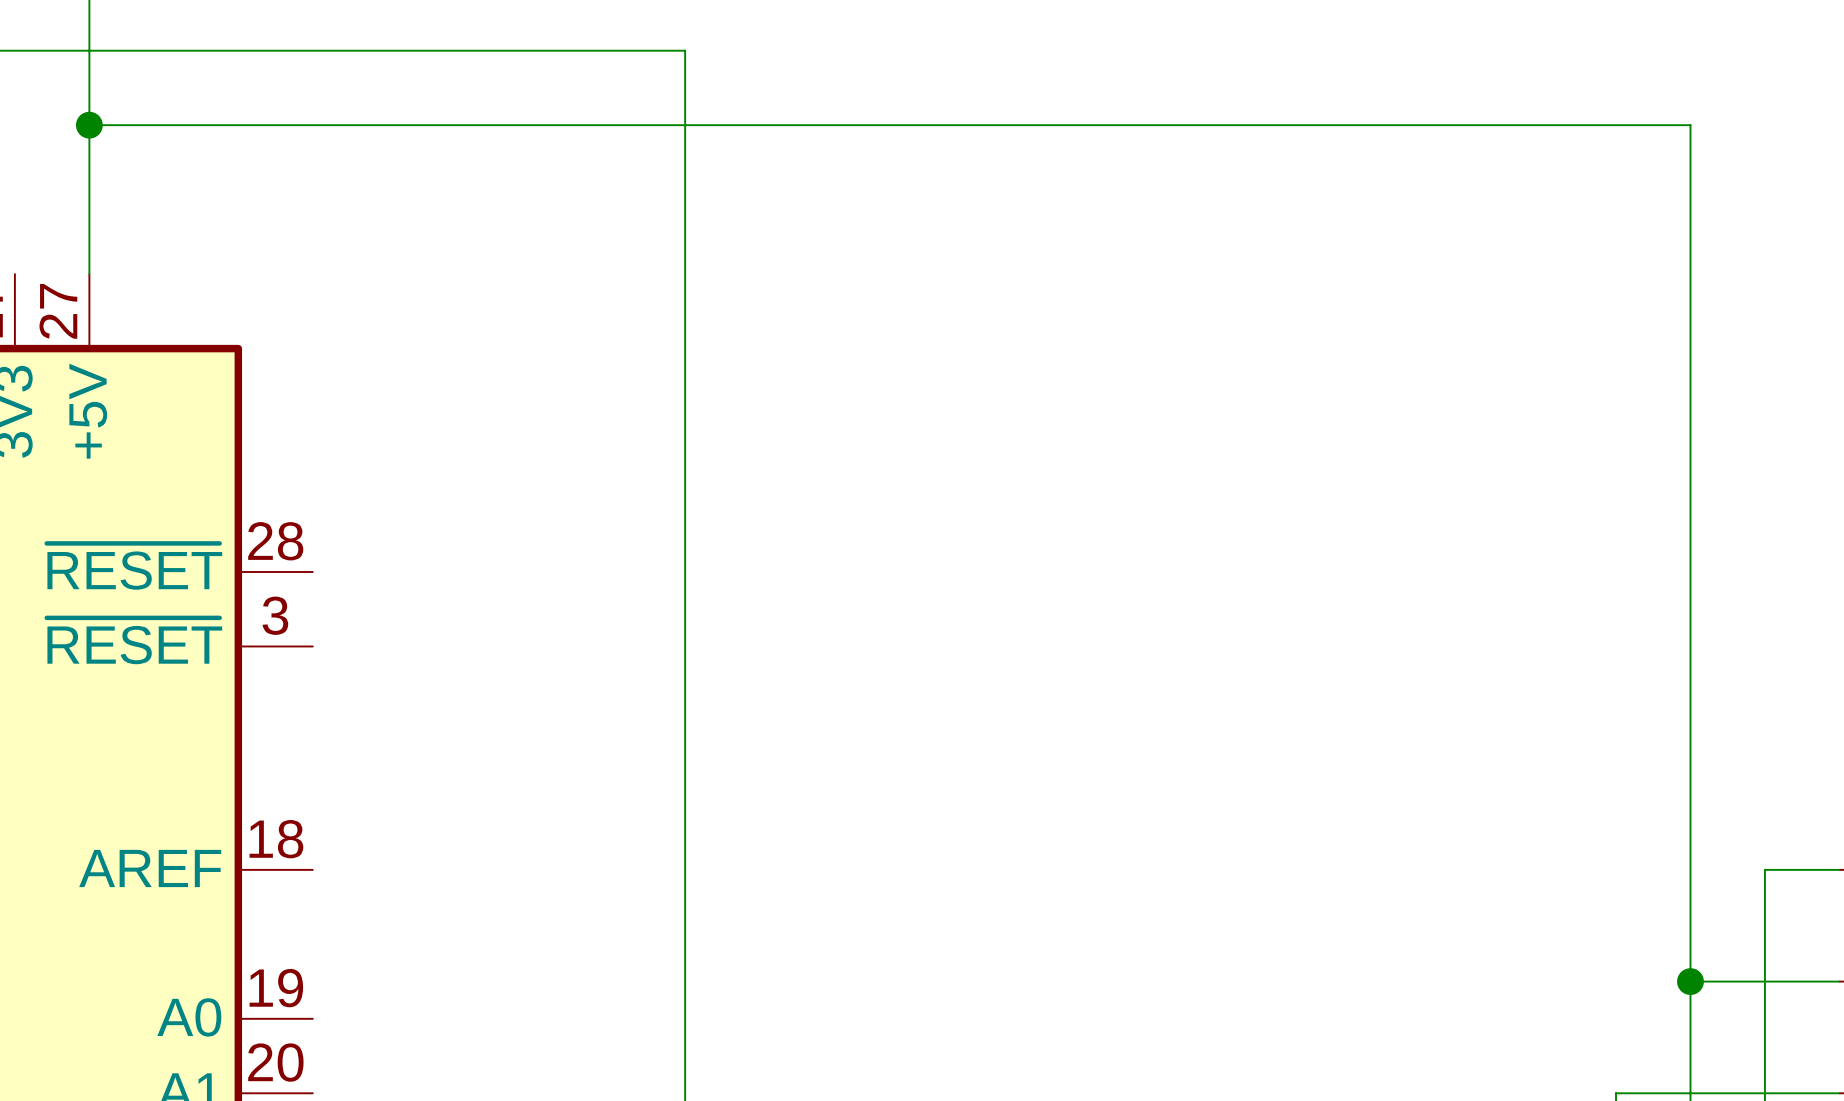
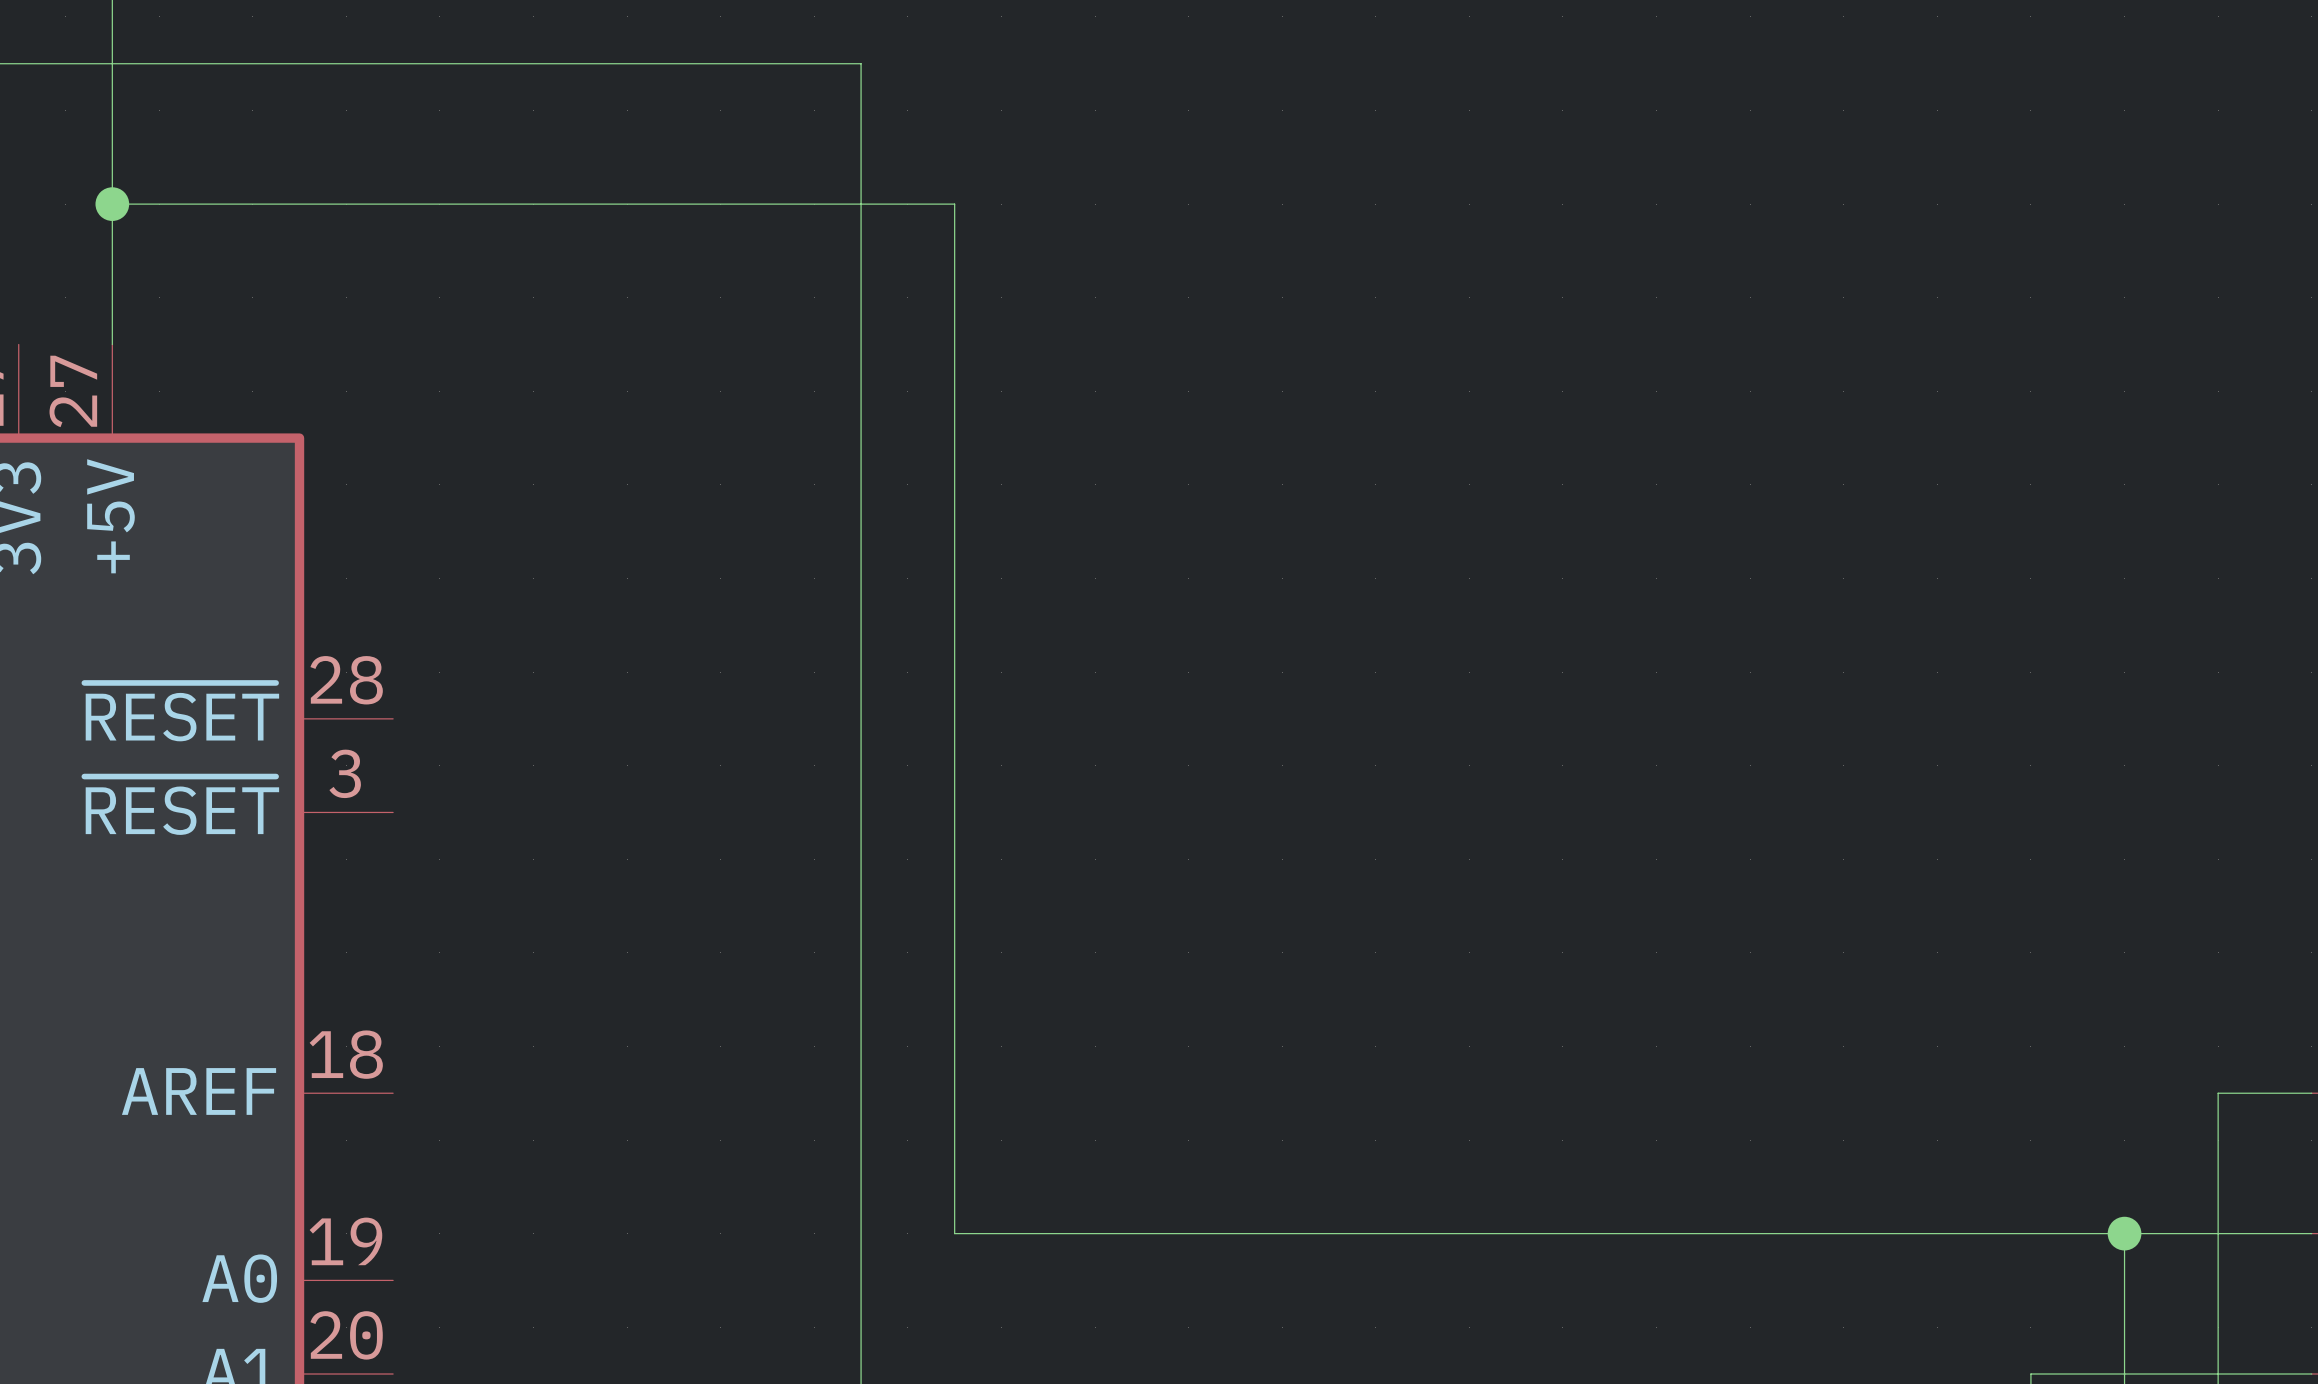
wire: (89, 125) (1690, 125) (1690, 981) -> (112, 204) (954, 204) (954, 1233) (2124, 1233)
junction position: (89, 125) -> (112, 204)

